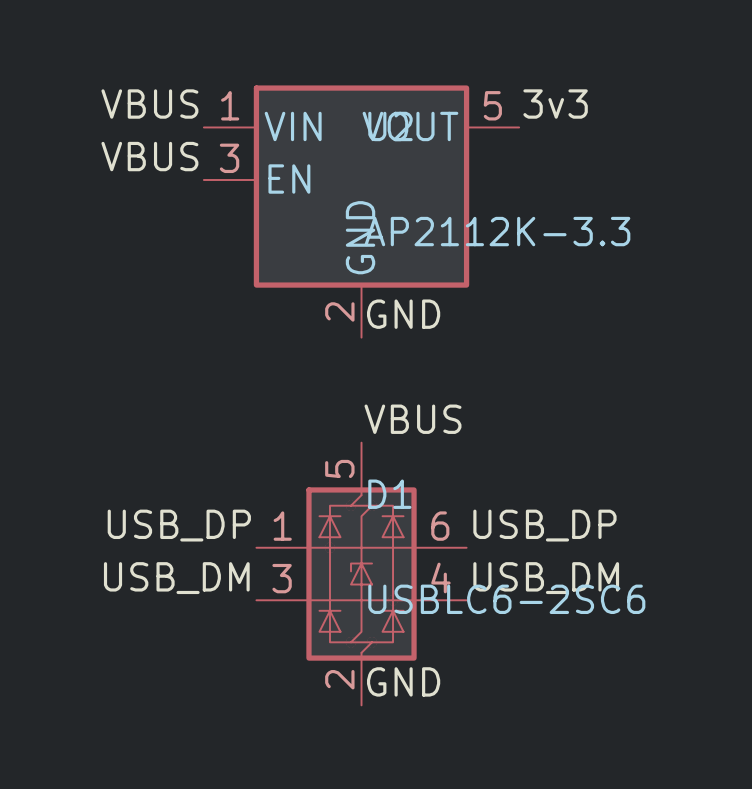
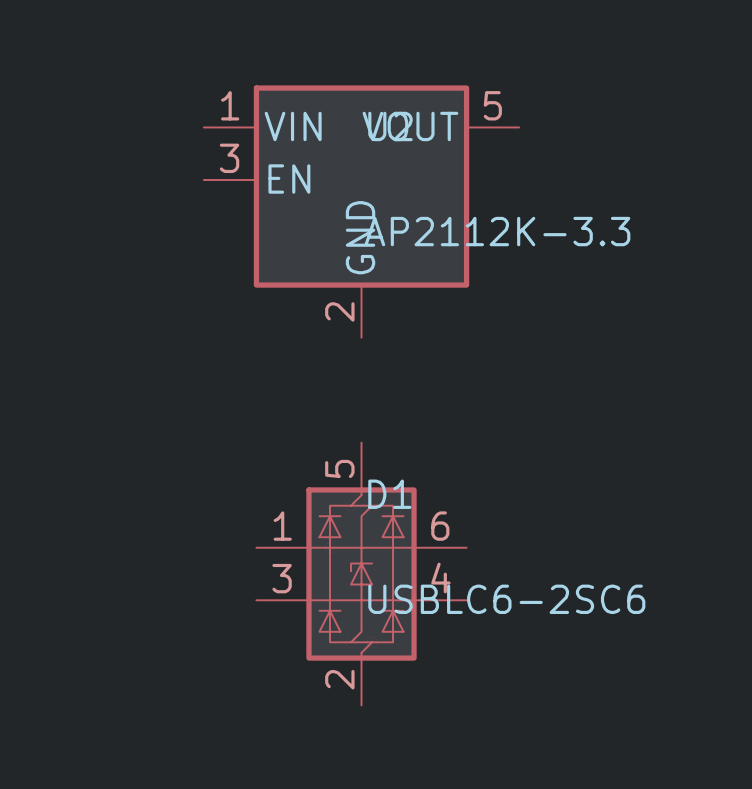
label: VBUS (149, 104) -> none
label: 3v3 (555, 104) -> none
label: VBUS (149, 156) -> none
label: GND (403, 314) -> none
label: VBUS (412, 419) -> none
label: USB_DP (179, 525) -> none
label: USB_DP (544, 525) -> none
label: USB_DM (176, 578) -> none
label: USB_DM (546, 578) -> none
label: GND (403, 681) -> none

